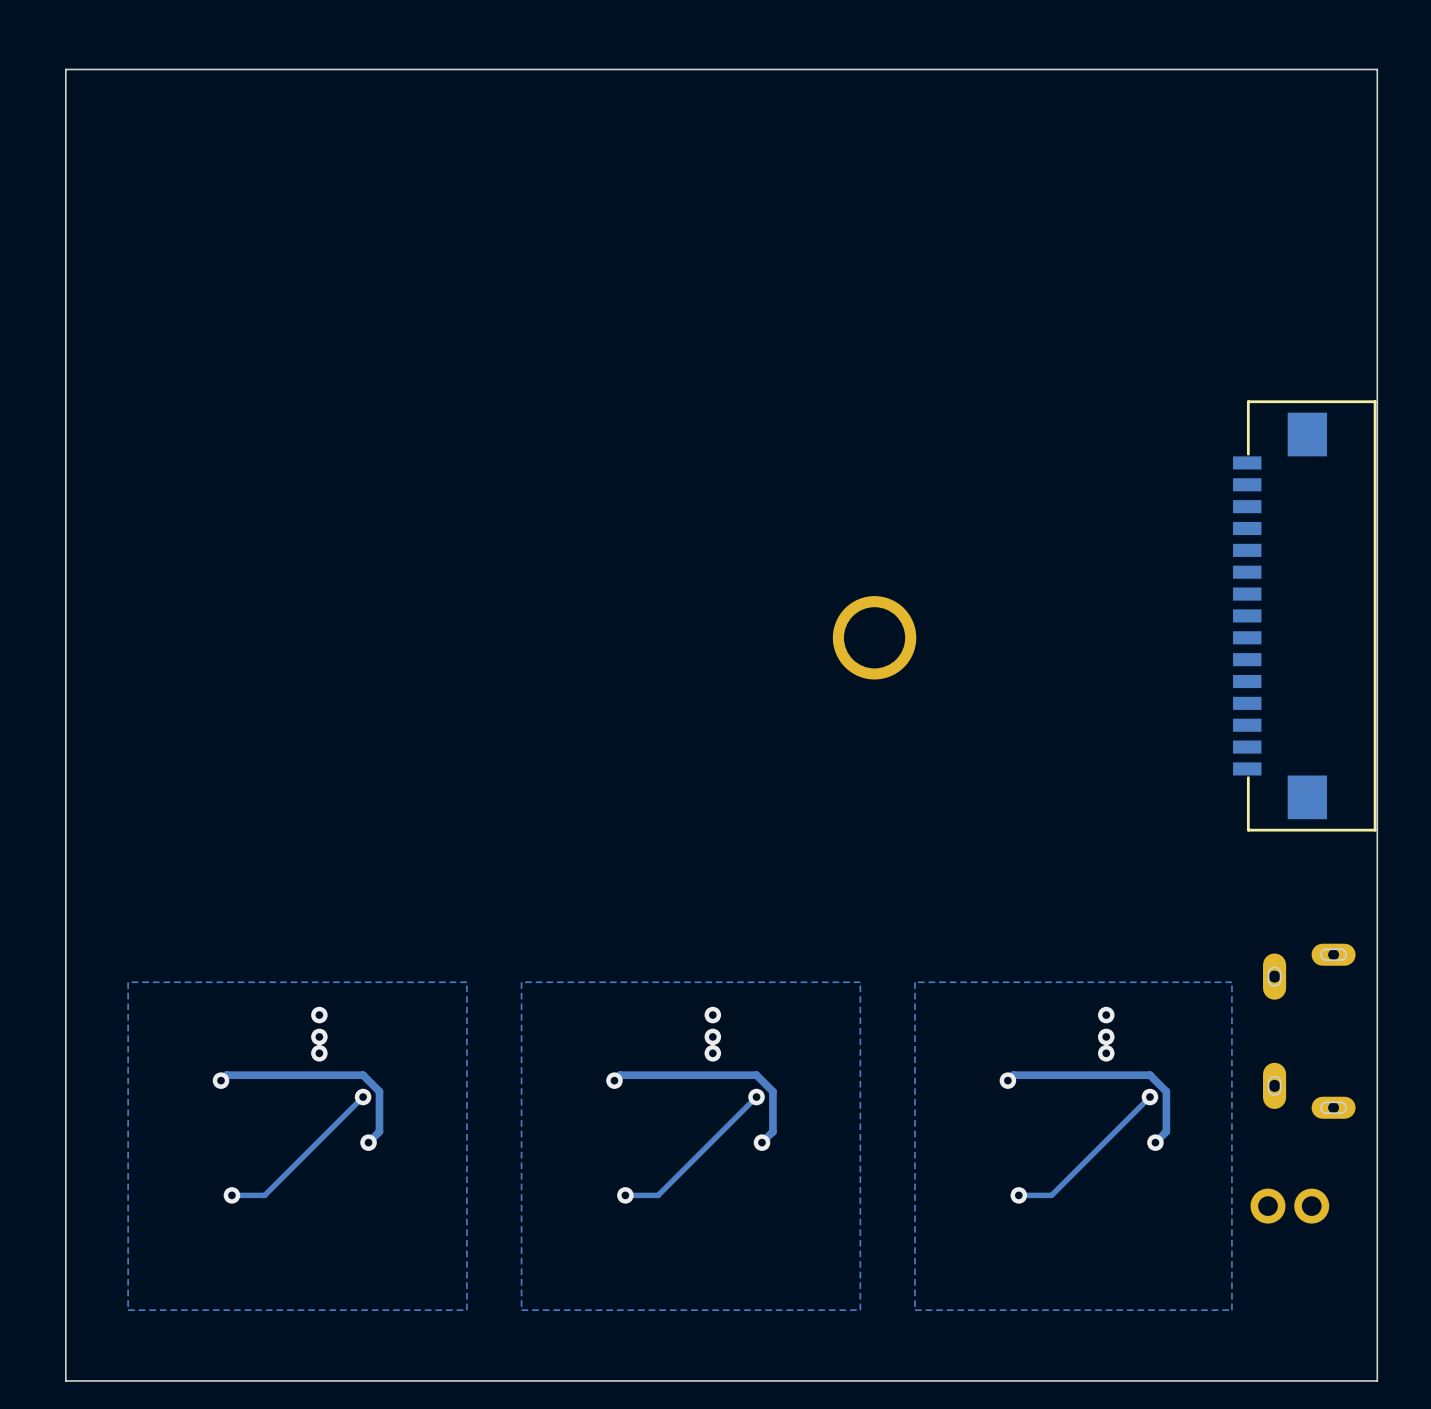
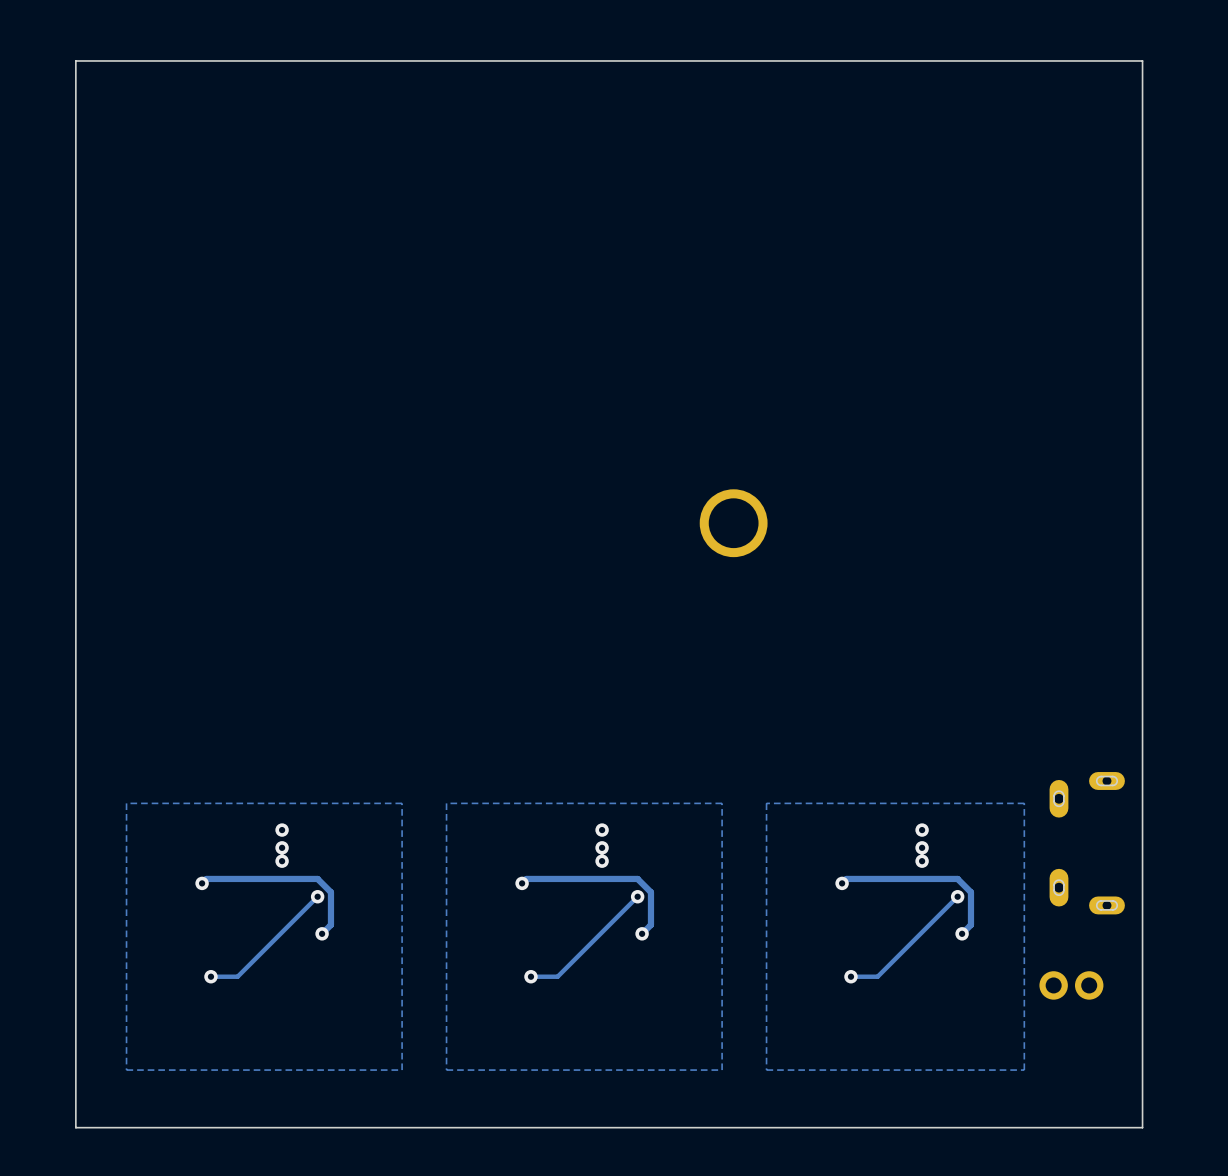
part: (1304, 615) -> none

